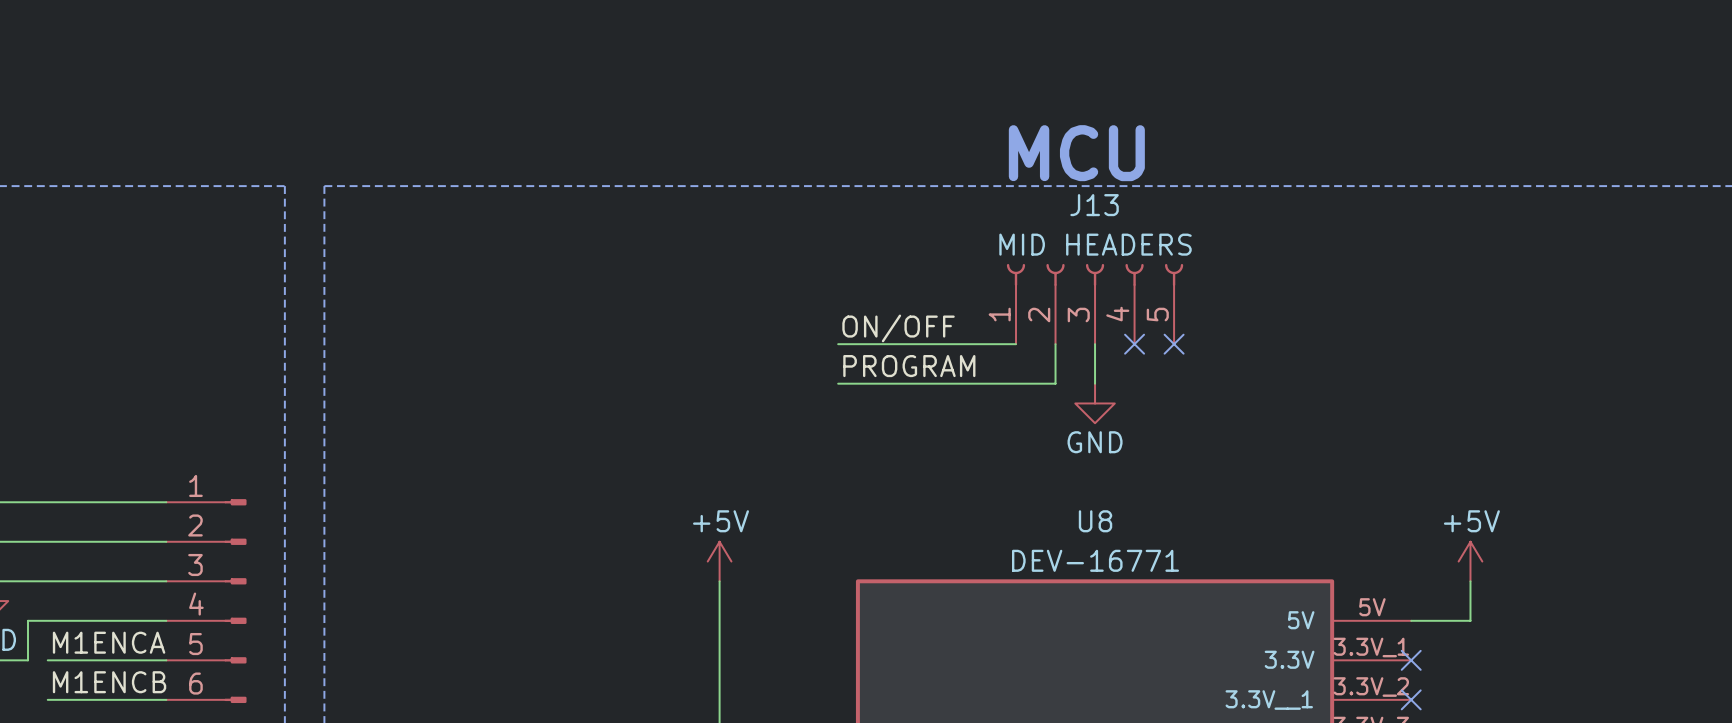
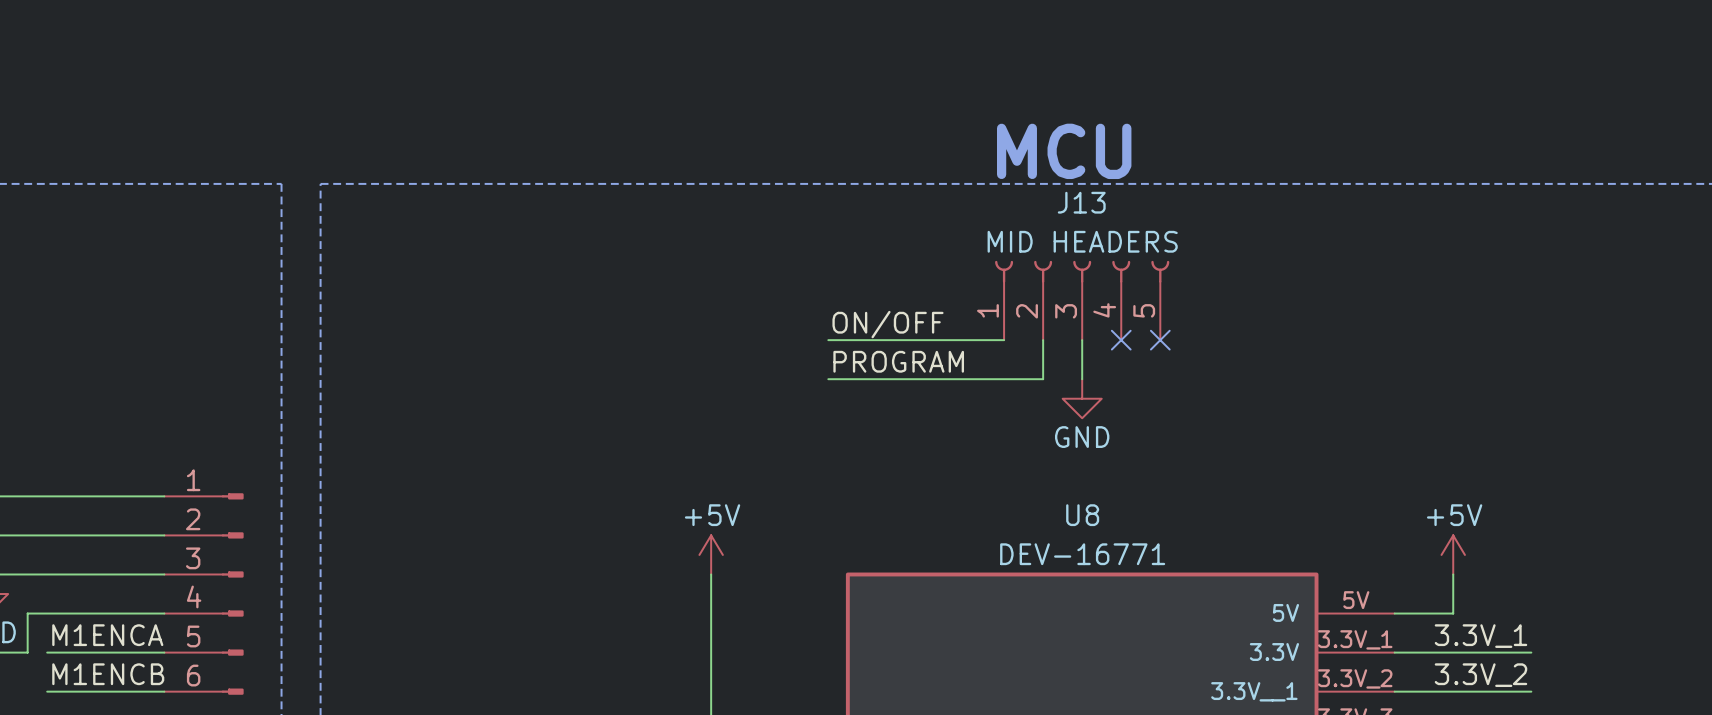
label: none -> 3.3V_1 (1480, 636)
wire: none -> (1394, 652) (1531, 652)
no-connect mark: (1411, 660) -> none
label: none -> 3.3V_2 (1480, 675)
wire: none -> (1394, 691) (1531, 691)
no-connect mark: (1411, 699) -> none

